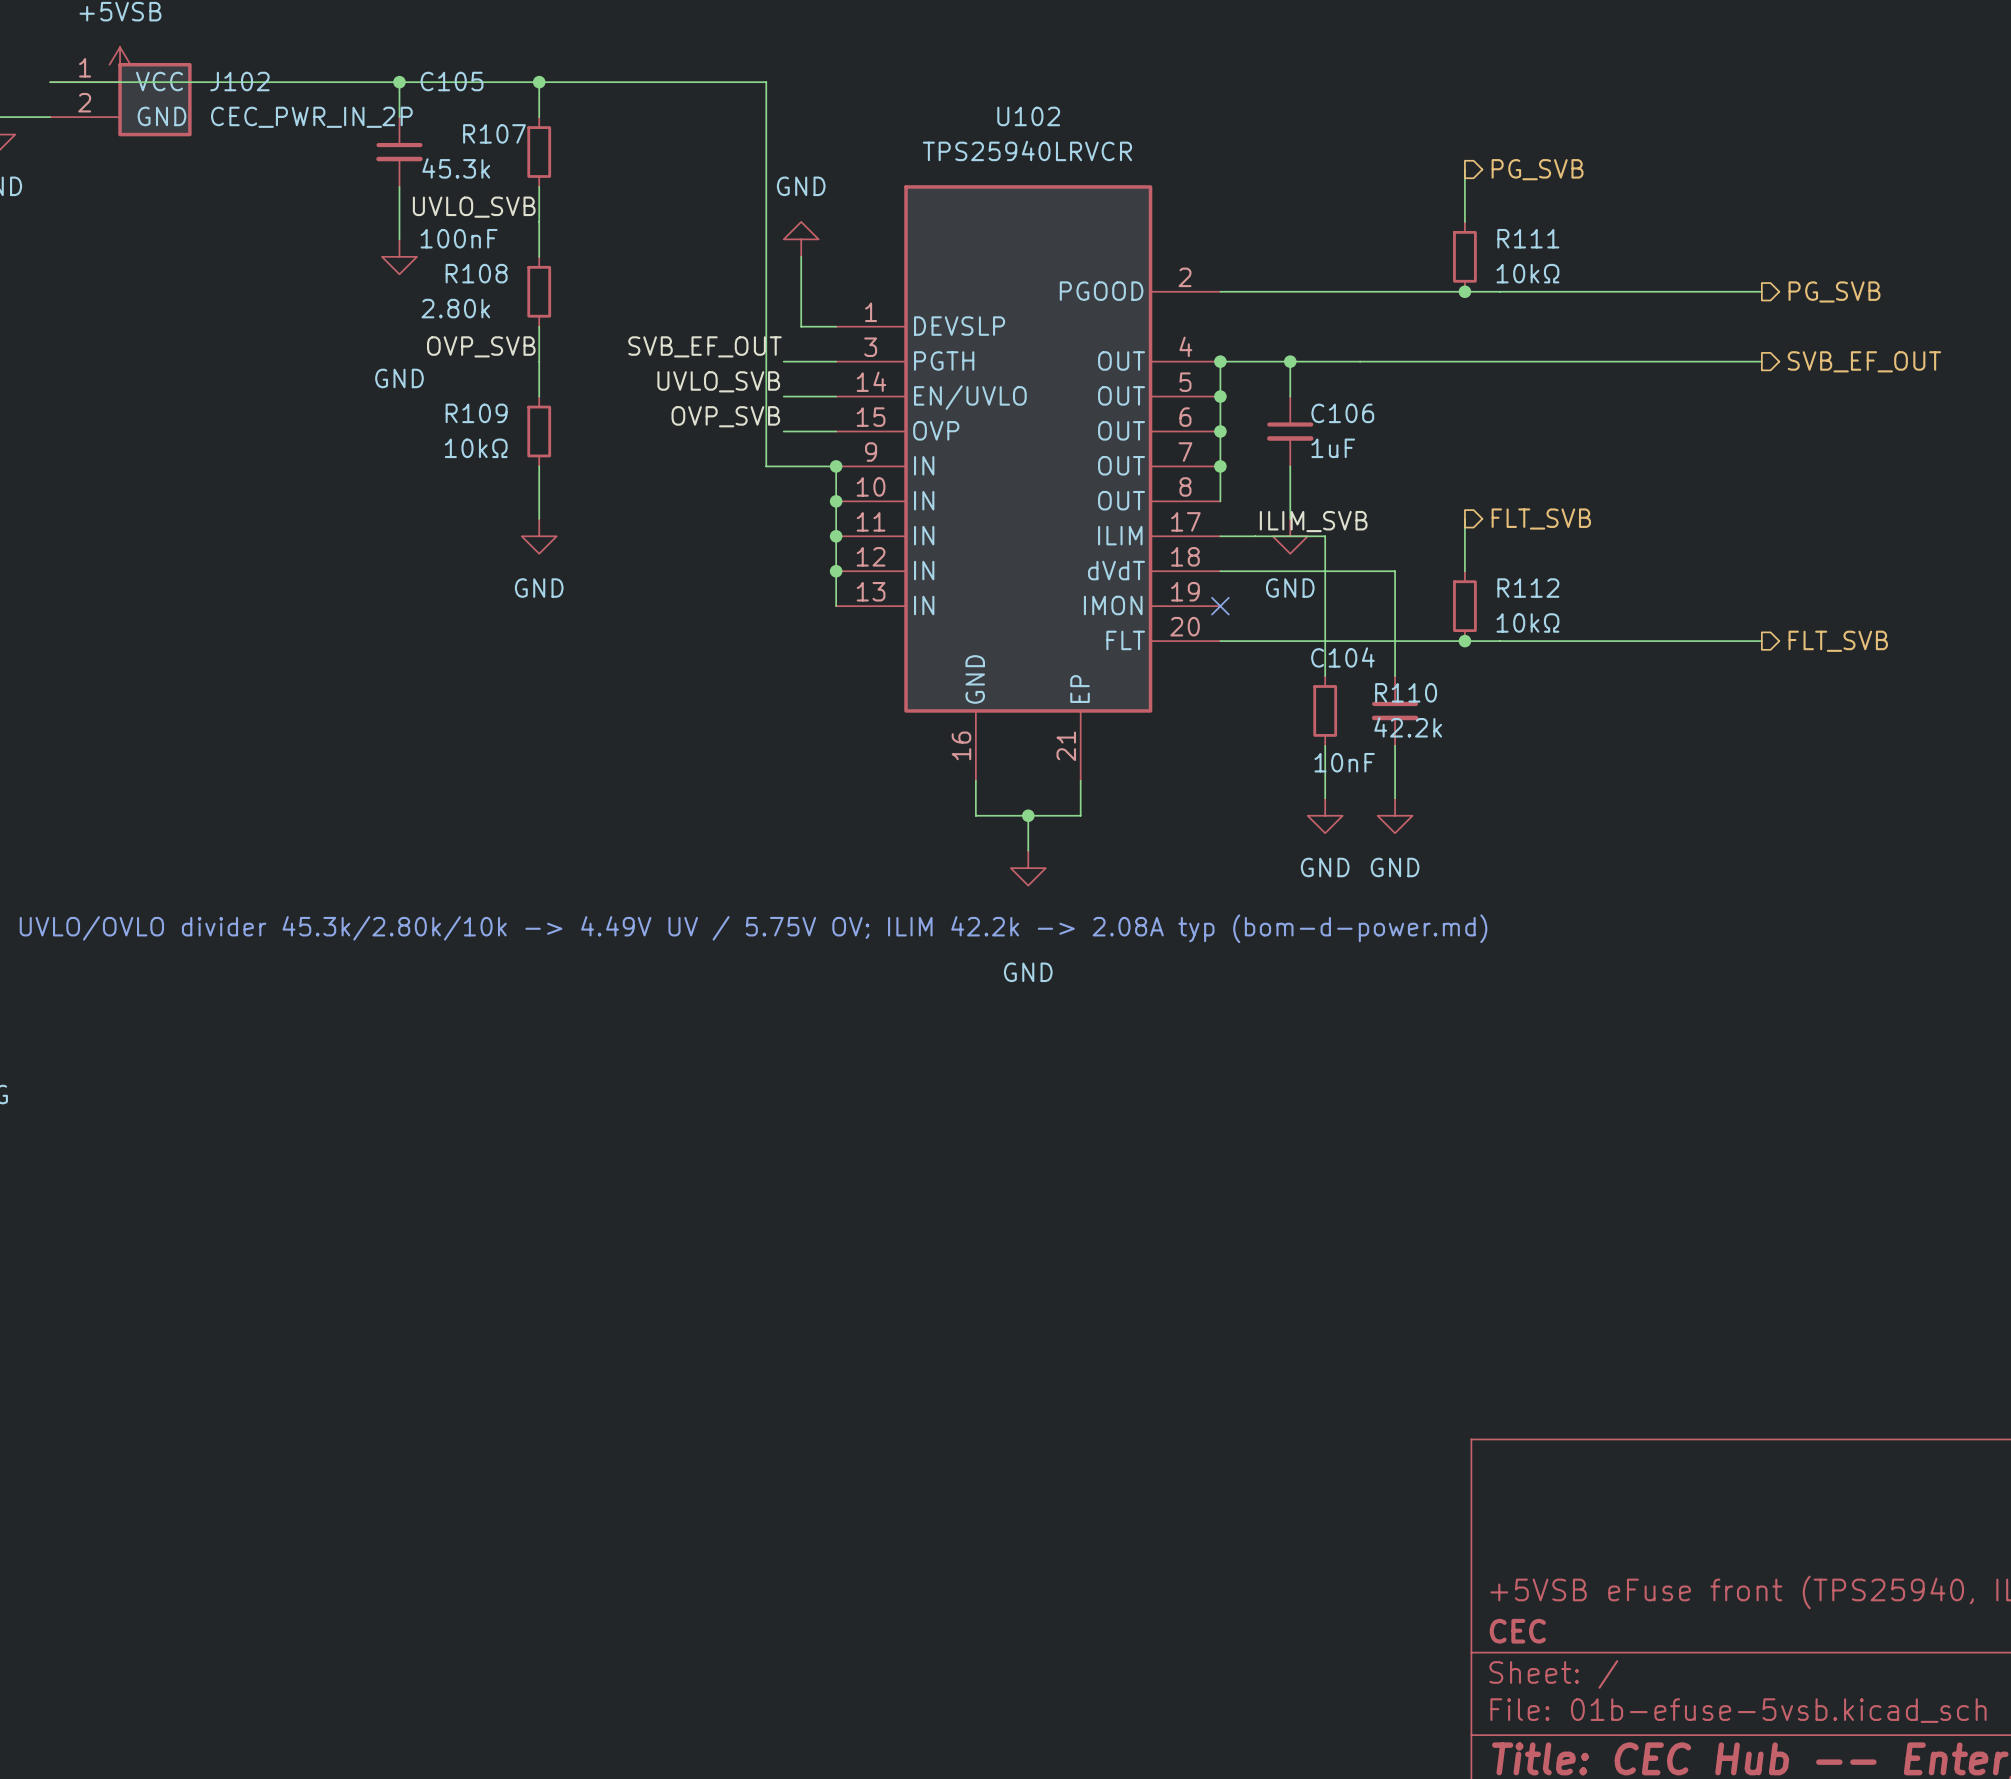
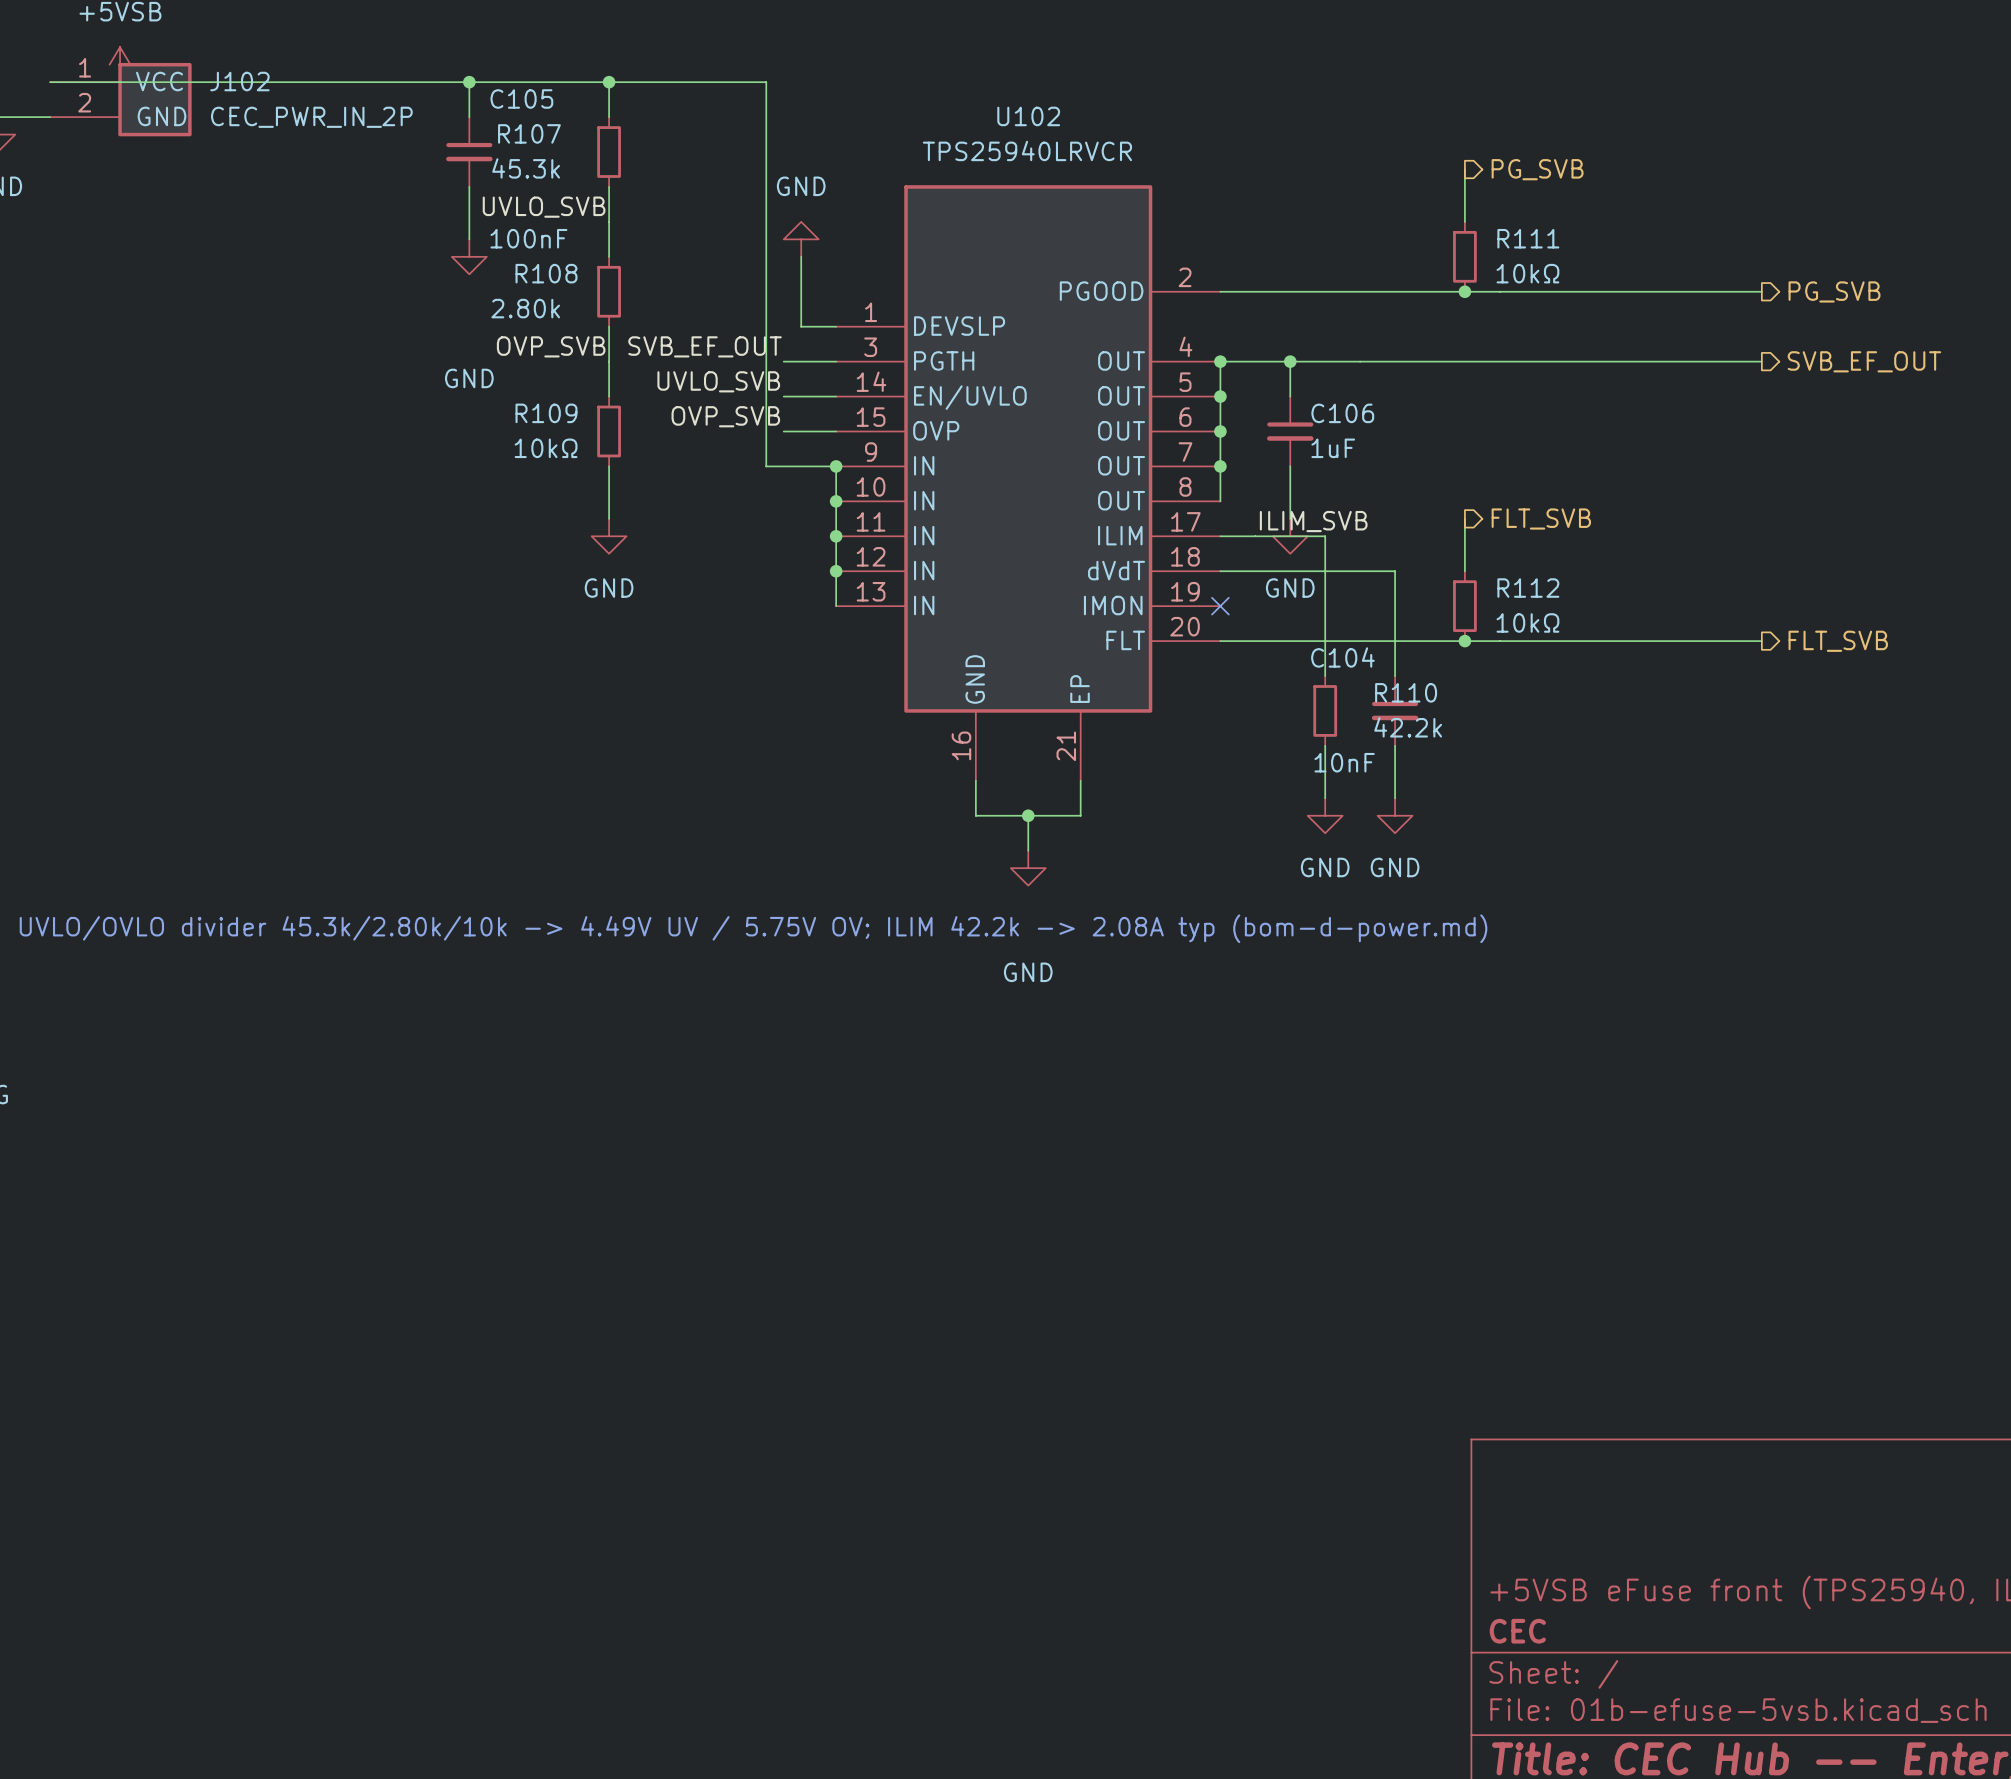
C105 name position: C105 (452, 81) -> C105 (521, 98)
wire: (399, 82) (399, 117) -> (469, 82) (469, 117)
junction: (399, 82) -> none
junction: none -> (469, 82)
wire: (539, 82) (539, 117) -> (609, 82) (609, 117)
junction: (539, 82) -> none
junction: none -> (609, 82)
R107 name position: R107 (494, 133) -> R107 (529, 133)
C105 position: (399, 152) -> (469, 152)
R107 position: (539, 152) -> (609, 152)
wire: (399, 186) (399, 239) -> (469, 186) (469, 239)
wire: (539, 186) (539, 256) -> (609, 186) (609, 256)
label position: UVLO_SVB (474, 207) -> UVLO_SVB (544, 207)
power symbol position: GND (399, 256) -> GND (469, 256)
R108 position: (539, 291) -> (609, 291)
wire: (539, 326) (539, 396) -> (609, 326) (609, 396)
label position: OVP_SVB (481, 346) -> OVP_SVB (551, 346)
R109 position: (539, 431) -> (609, 431)
wire: (539, 466) (539, 518) -> (609, 466) (609, 518)
power symbol position: GND (539, 536) -> GND (609, 536)

